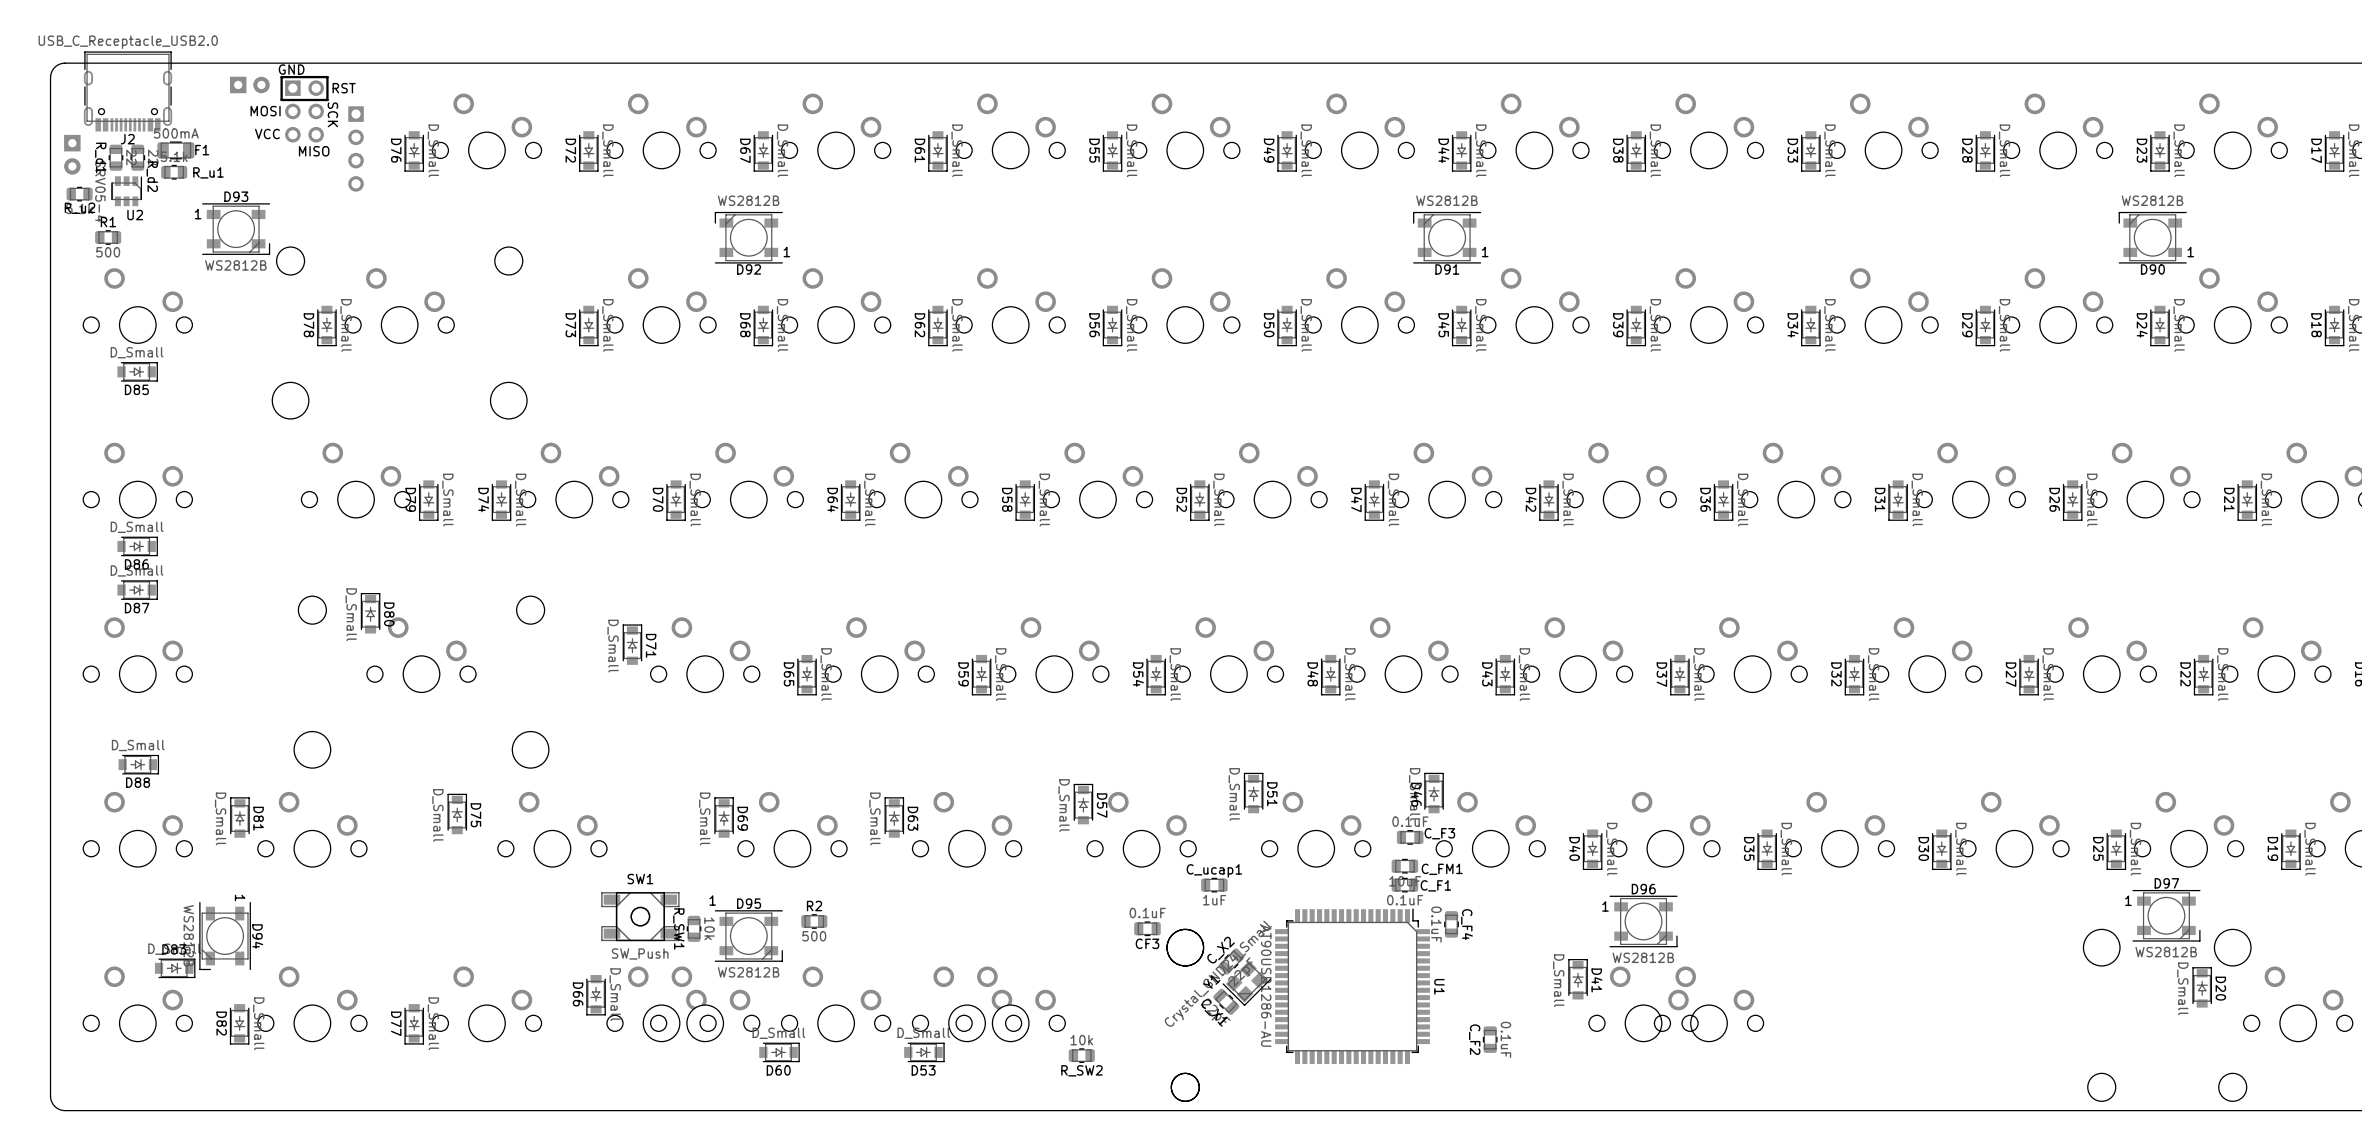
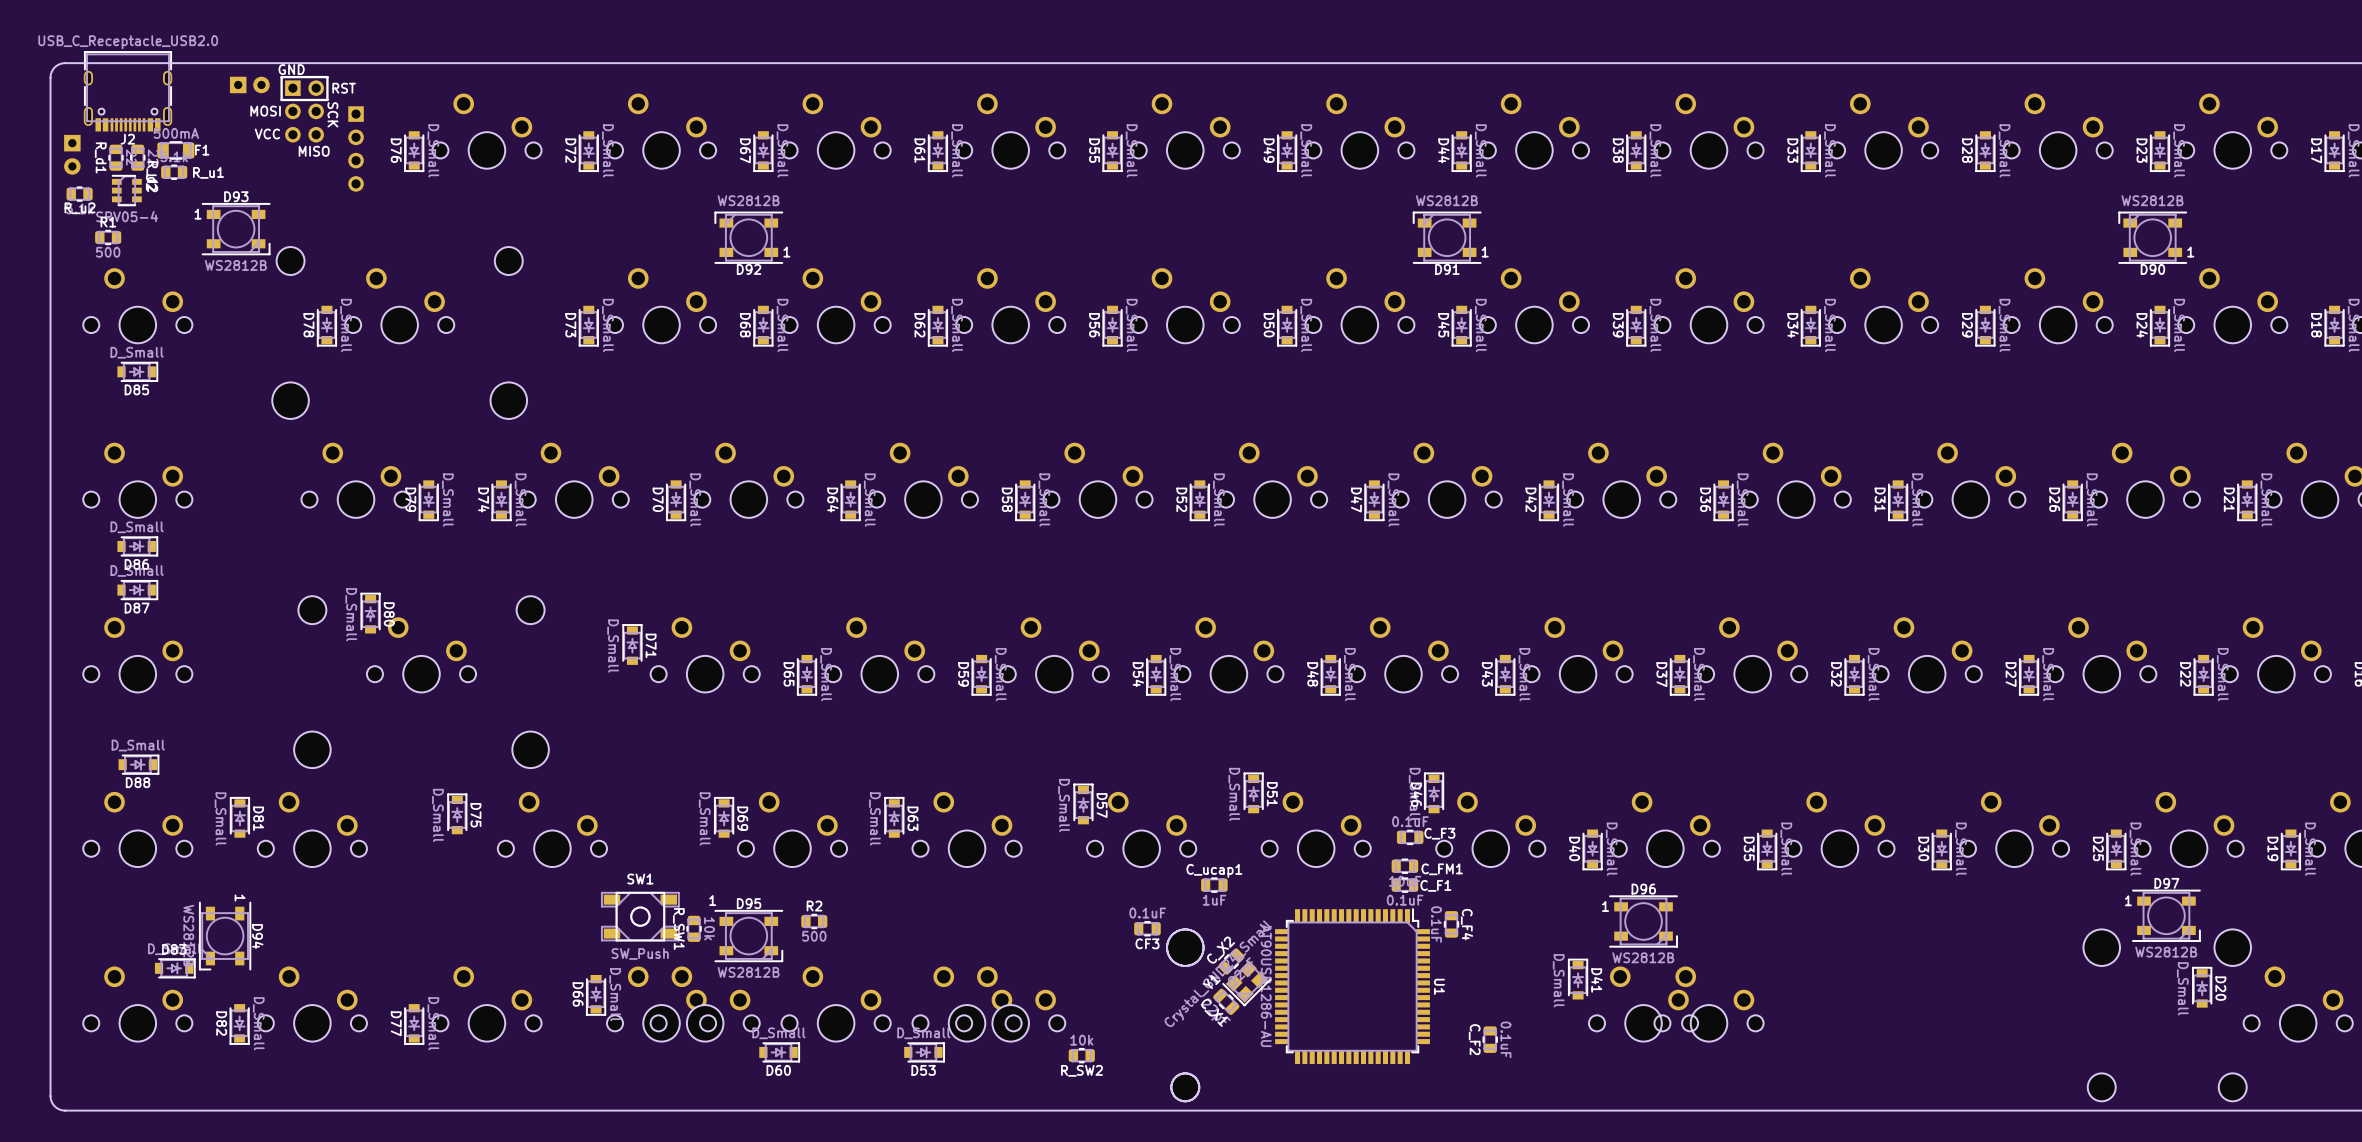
U2 rotation: 0° (126, 191) -> 90° counterclockwise (126, 190)

